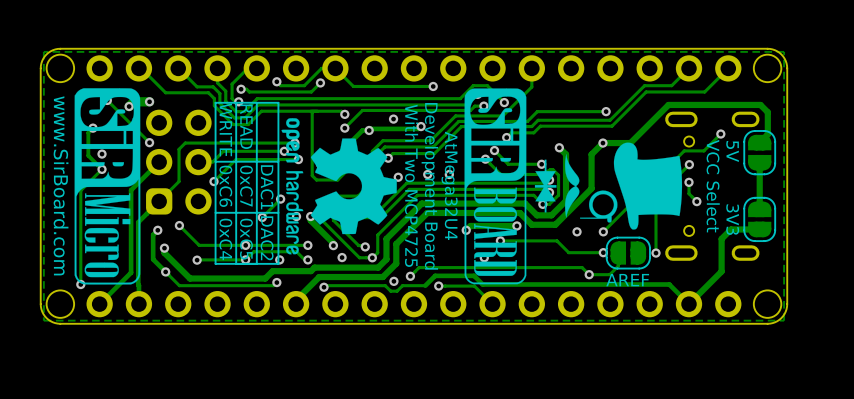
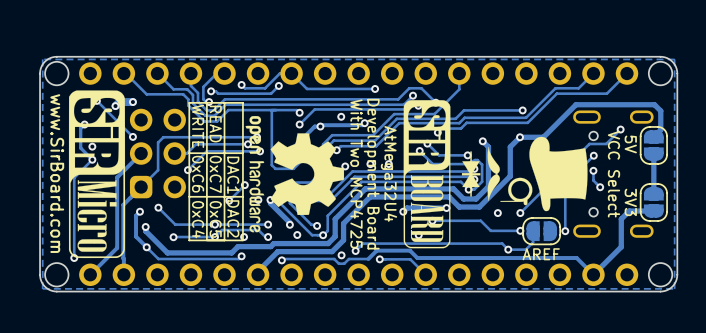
drawing shape: [464, 88, 527, 285] -> [403, 100, 451, 249]

